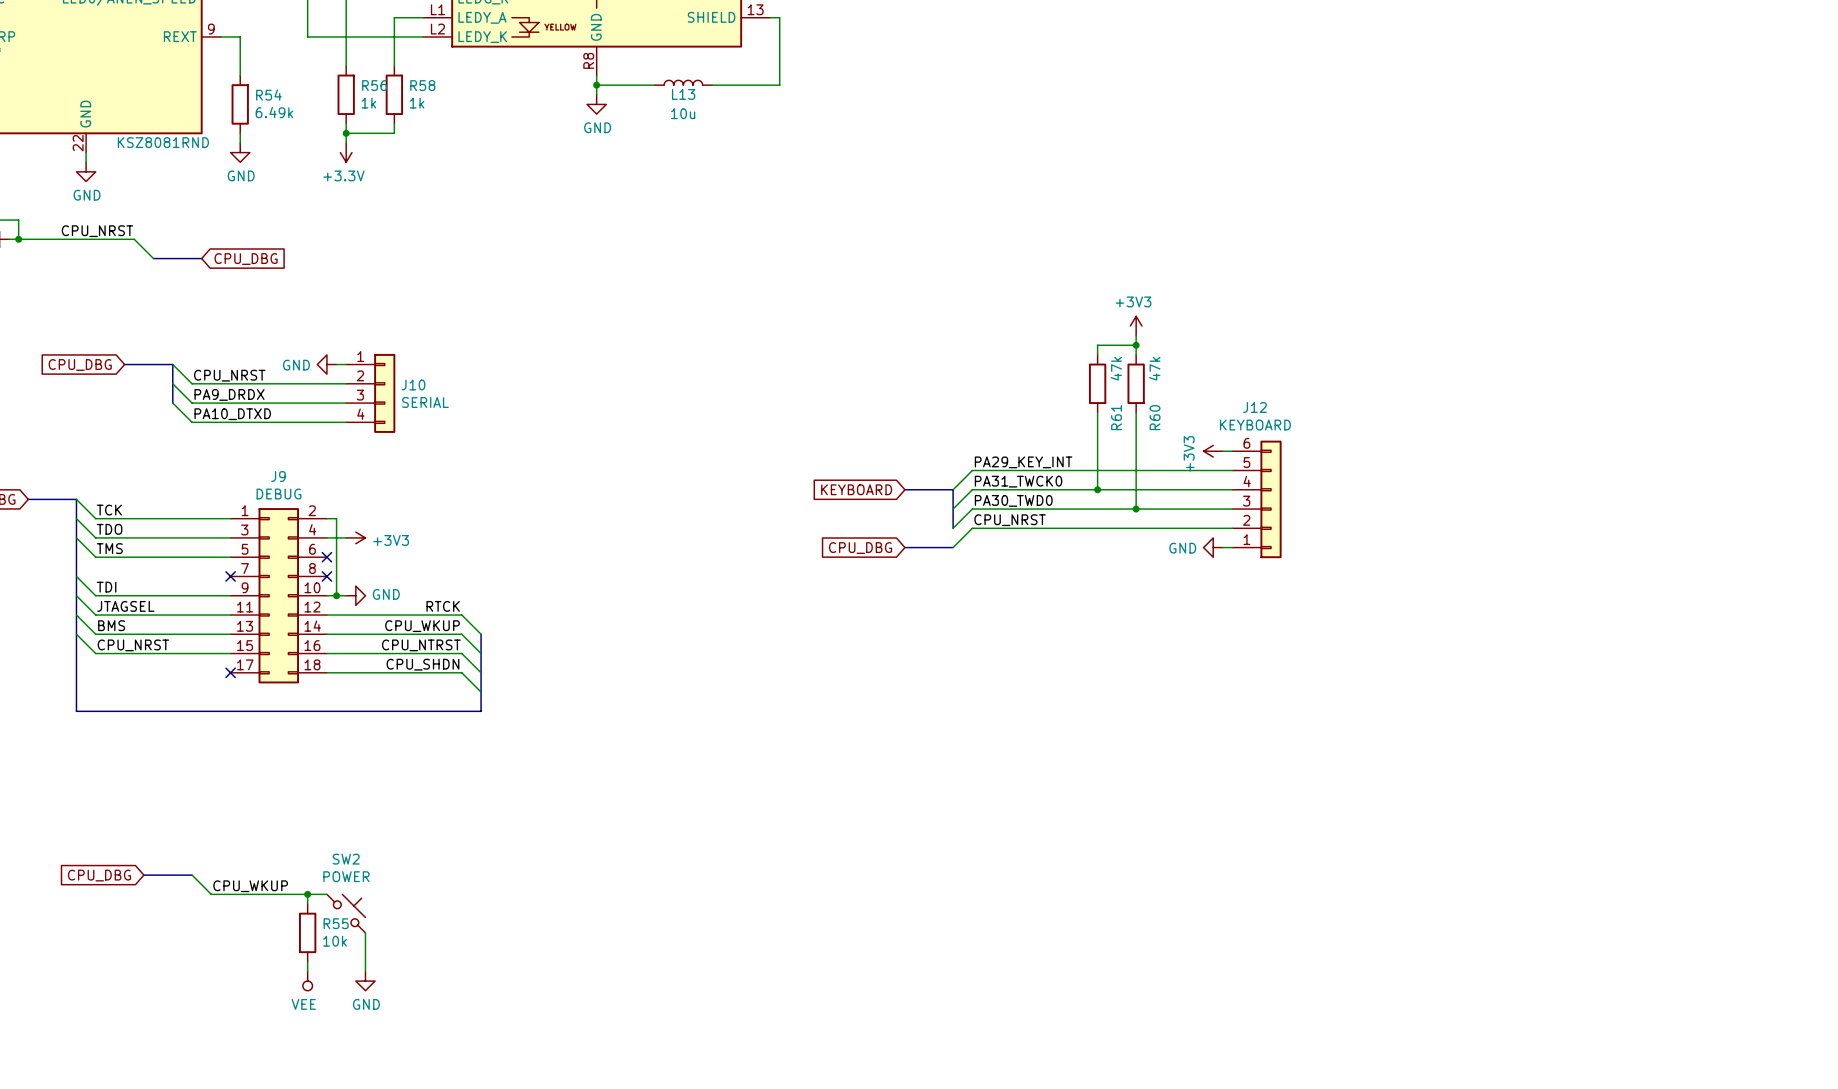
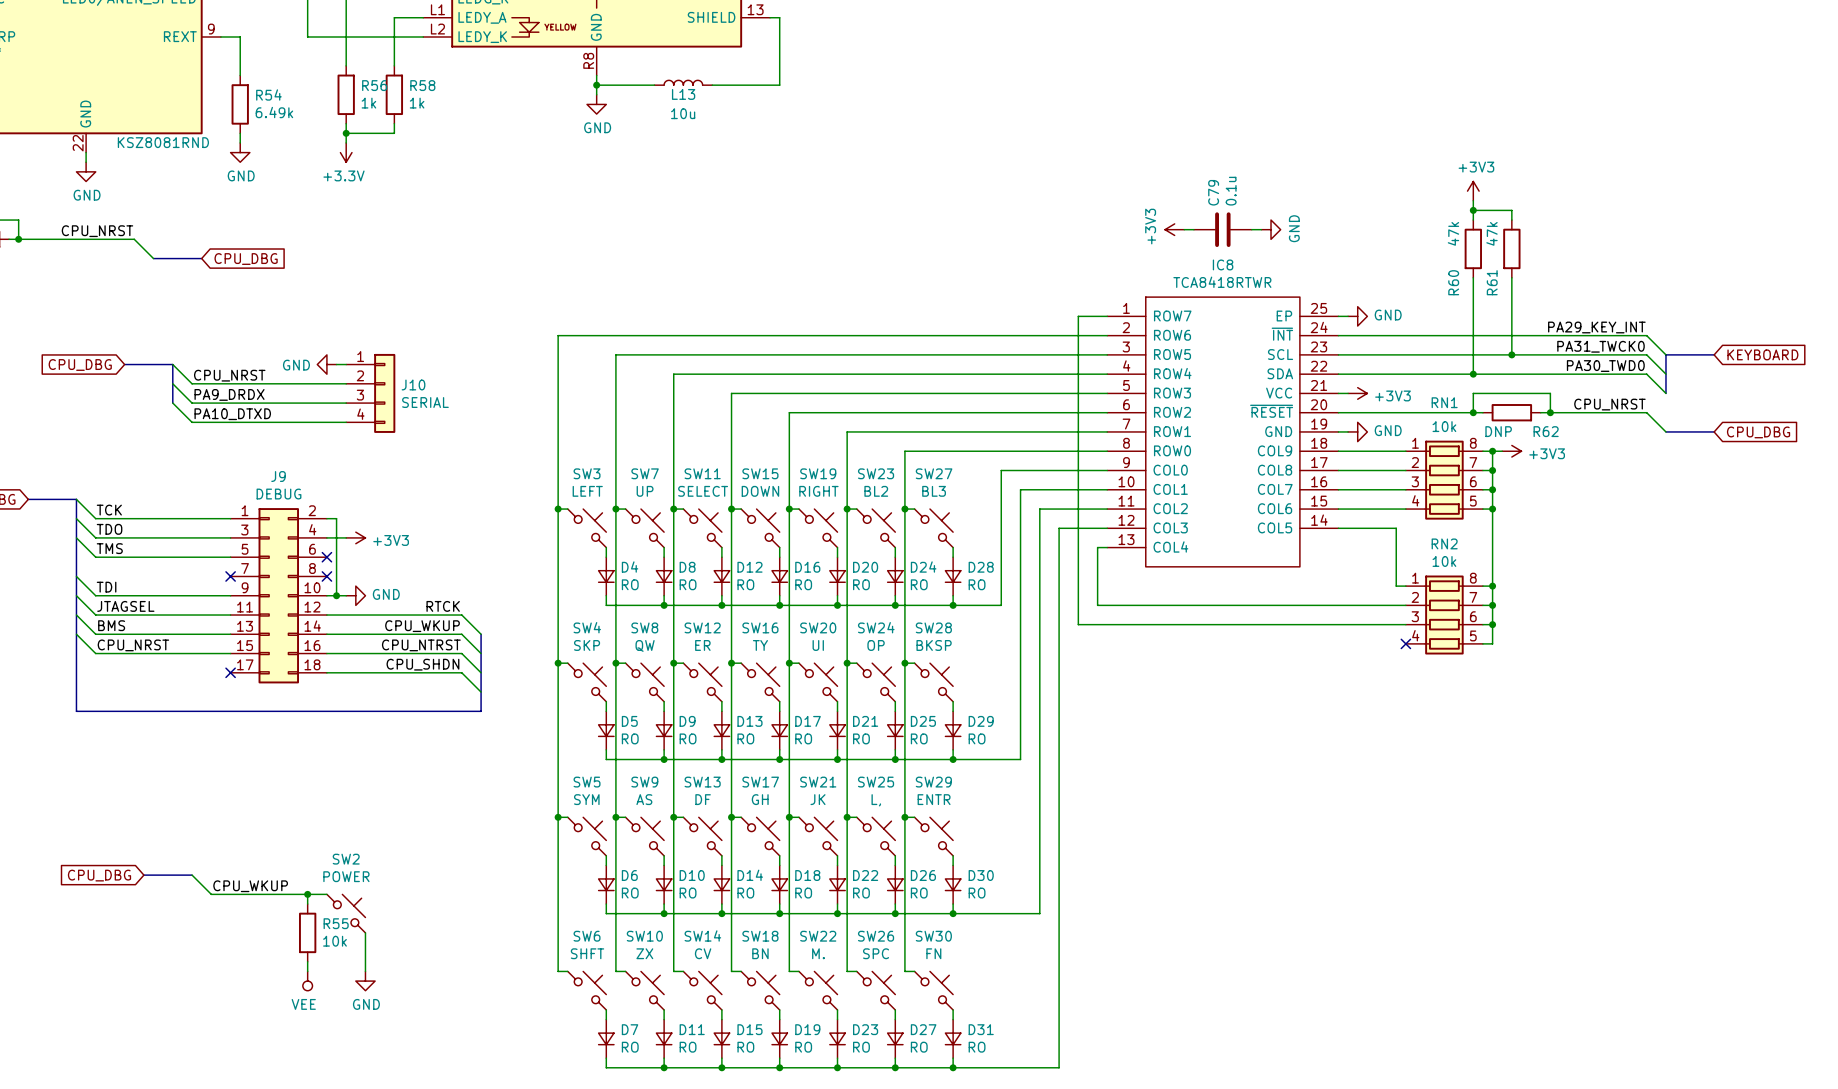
power symbol: none -> +3V3 (1473, 191)
wire: none -> (1473, 200) (1473, 220)
wire: none -> (1473, 210) (1511, 210) (1511, 220)
junction: none -> (1473, 210)
wire: none -> (1184, 229) (1193, 229)
C79: none -> 0.1u (1222, 229)
wire: none -> (1251, 229) (1261, 229)
power symbol: none -> GND (1271, 229)
wire: none -> (1473, 277) (1473, 374)
wire: none -> (1511, 277) (1511, 354)
wire: none -> (1107, 316) (1078, 316) (1078, 624) (1405, 624)
wire: none -> (1338, 316) (1348, 316)
power symbol: none -> GND (1357, 316)
power symbol rotation: 0° (1136, 326) -> 90° counterclockwise (1174, 229)
power symbol position: +3V3 (1136, 326) -> +3V3 (1174, 229)
label: none -> PA29_KEY_INT (1596, 327)
wire: none -> (1107, 335) (558, 335) (558, 971) (567, 971)
wire: (1136, 335) (1136, 354) -> none
wire: none -> (1338, 335) (1646, 335) (1665, 354)
wire: (1136, 345) (1097, 345) (1097, 354) -> none
junction: (1136, 345) -> none
label: none -> PA31_TWCK0 (1601, 346)
wire: none -> (1107, 354) (615, 354) (615, 971) (625, 971)
wire: none -> (1338, 354) (1646, 354) (1665, 374)
junction: none -> (1511, 354)
bus: none -> (1714, 354) (1665, 354) (1665, 393)
global label: none -> KEYBOARD (1762, 354)
label: none -> PA30_TWD0 (1605, 366)
R61 value position: 47k (1116, 368) -> 47k (1491, 233)
R60 value position: 47k (1154, 368) -> 47k (1453, 233)
wire: none -> (1107, 374) (673, 374) (673, 971) (683, 971)
wire: none -> (1338, 374) (1646, 374) (1665, 393)
junction: none -> (1473, 374)
R61 position: (1097, 383) -> (1511, 248)
R60 position: (1136, 383) -> (1473, 248)
wire: none -> (1107, 393) (731, 393) (731, 971) (741, 971)
wire: none -> (1338, 393) (1348, 393)
power symbol: none -> +3V3 (1357, 393)
label: none -> CPU_NRST (1609, 404)
wire: (1097, 412) (1097, 489) -> none
wire: none -> (1107, 412) (789, 412) (789, 971) (798, 971)
wire: (1136, 412) (1136, 509) -> none
wire: none -> (1338, 412) (1482, 412)
wire: none -> (1473, 412) (1473, 393) (1550, 393) (1550, 412)
junction: none -> (1473, 412)
R62: none -> DNP (1511, 412)
wire: none -> (1540, 412) (1646, 412) (1665, 431)
junction: none -> (1550, 412)
R61 name position: R61 (1116, 417) -> R61 (1492, 282)
R60 name position: R60 (1155, 417) -> R60 (1453, 282)
wire: none -> (1107, 431) (847, 431) (847, 971) (856, 971)
IC8: none -> TCA8418RTWR (1222, 431)
power symbol: none -> GND (1357, 431)
bus: none -> (1665, 431) (1714, 431)
global label: none -> CPU_DBG (1758, 432)
wire: none -> (1107, 451) (904, 451) (904, 971) (914, 971)
power symbol: +3V3 (1213, 451) -> none
wire: (1222, 451) (1232, 451) -> (1338, 431) (1348, 431)
wire: none -> (1338, 451) (1405, 451)
wire: none -> (1482, 451) (1502, 451)
wire: none -> (1492, 451) (1492, 643) (1482, 643)
junction: none -> (1492, 451)
power symbol: none -> +3V3 (1511, 451)
label: PA29_KEY_INT (1023, 462) -> none
wire: (1001, 470) (972, 470) (953, 489) -> (1001, 470) (1001, 605) (606, 605) (606, 595)
wire: (1107, 470) (1232, 470) -> none
wire: none -> (1338, 470) (1405, 470)
wire: none -> (1482, 470) (1492, 470)
junction: none -> (1492, 470)
RN1: none -> 10k (1444, 480)
label: PA31_TWCK0 (1018, 481) -> none
global label: KEYBOARD (856, 489) -> none
bus: (904, 489) (953, 489) (953, 528) -> none
wire: (1020, 489) (972, 489) (953, 509) -> (1020, 489) (1020, 759) (606, 759) (606, 749)
junction: (1097, 489) -> none
wire: (1107, 489) (1232, 489) -> none
wire: none -> (1338, 489) (1405, 489)
wire: none -> (1482, 489) (1492, 489)
junction: none -> (1492, 489)
J12: KEYBOARD (1257, 499) -> none
label: PA30_TWD0 (1013, 500) -> none
wire: none -> (558, 509) (567, 509)
junction: none -> (558, 509)
wire: none -> (615, 509) (625, 509)
junction: none -> (615, 509)
wire: none -> (673, 509) (683, 509)
junction: none -> (673, 509)
wire: none -> (731, 509) (741, 509)
junction: none -> (731, 509)
wire: none -> (789, 509) (798, 509)
junction: none -> (789, 509)
wire: none -> (847, 509) (856, 509)
junction: none -> (847, 509)
wire: none -> (904, 509) (914, 509)
junction: none -> (904, 509)
wire: (1039, 509) (972, 509) (953, 528) -> (1039, 509) (1039, 913) (606, 913) (606, 904)
wire: (1107, 509) (1232, 509) -> none
junction: (1136, 509) -> none
wire: none -> (1338, 509) (1405, 509)
wire: none -> (1482, 509) (1492, 509)
junction: none -> (1492, 509)
label: CPU_NRST (1010, 520) -> none
SW3: none -> LEFT (587, 528)
SW7: none -> UP (644, 528)
SW11: none -> SELECT (702, 528)
SW15: none -> DOWN (760, 528)
SW19: none -> RIGHT (818, 528)
SW23: none -> BL2 (876, 528)
SW27: none -> BL3 (933, 528)
wire: (1059, 528) (972, 528) (953, 547) -> (953, 557) (953, 547)
wire: none -> (1059, 528) (1059, 1067) (606, 1067) (606, 1058)
wire: (1107, 528) (1232, 528) -> none
wire: none -> (1338, 528) (1396, 528) (1396, 586) (1405, 586)
wire: none -> (606, 547) (606, 557)
wire: none -> (664, 547) (664, 557)
wire: none -> (721, 547) (721, 557)
wire: none -> (779, 547) (779, 557)
wire: none -> (837, 547) (837, 557)
wire: none -> (895, 547) (895, 557)
bus: (904, 547) (953, 547) -> none
wire: none -> (1107, 547) (1097, 547) (1097, 605) (1405, 605)
power symbol: GND (1213, 547) -> none
wire: (1222, 547) (1232, 547) -> none
global label: CPU_DBG (860, 548) -> none
D4: none -> RO (606, 576)
D8: none -> RO (664, 576)
D12: none -> RO (721, 576)
D16: none -> RO (779, 576)
D20: none -> RO (837, 576)
D24: none -> RO (895, 576)
D28: none -> RO (953, 576)
wire: none -> (1482, 586) (1492, 586)
junction: none -> (1492, 586)
wire: none -> (664, 595) (664, 605)
wire: none -> (721, 595) (721, 605)
wire: none -> (779, 595) (779, 605)
wire: none -> (837, 595) (837, 605)
wire: none -> (895, 595) (895, 605)
wire: none -> (953, 595) (953, 605)
junction: none -> (664, 605)
junction: none -> (721, 605)
junction: none -> (779, 605)
junction: none -> (837, 605)
junction: none -> (895, 605)
junction: none -> (953, 605)
wire: none -> (1482, 605) (1492, 605)
junction: none -> (1492, 605)
RN2: none -> 10k (1444, 615)
wire: none -> (1482, 624) (1492, 624)
junction: none -> (1492, 624)
no-connect mark: none -> (1405, 643)
wire: none -> (558, 663) (567, 663)
junction: none -> (558, 663)
wire: none -> (615, 663) (625, 663)
junction: none -> (615, 663)
wire: none -> (673, 663) (683, 663)
junction: none -> (673, 663)
wire: none -> (731, 663) (741, 663)
junction: none -> (731, 663)
wire: none -> (789, 663) (798, 663)
junction: none -> (789, 663)
wire: none -> (847, 663) (856, 663)
junction: none -> (847, 663)
wire: none -> (904, 663) (914, 663)
junction: none -> (904, 663)
SW4: none -> SKP (587, 682)
SW8: none -> QW (644, 682)
SW12: none -> ER (702, 682)
SW16: none -> TY (760, 682)
SW20: none -> UI (818, 682)
SW24: none -> OP (876, 682)
SW28: none -> BKSP (933, 682)
wire: none -> (606, 701) (606, 711)
wire: none -> (664, 701) (664, 711)
wire: none -> (721, 701) (721, 711)
wire: none -> (779, 701) (779, 711)
wire: none -> (837, 701) (837, 711)
wire: none -> (895, 701) (895, 711)
wire: none -> (953, 701) (953, 711)
D5: none -> RO (606, 730)
D9: none -> RO (664, 730)
D13: none -> RO (721, 730)
D17: none -> RO (779, 730)
D21: none -> RO (837, 730)
D25: none -> RO (895, 730)
D29: none -> RO (953, 730)
wire: none -> (664, 749) (664, 759)
wire: none -> (721, 749) (721, 759)
wire: none -> (779, 749) (779, 759)
wire: none -> (837, 749) (837, 759)
wire: none -> (895, 749) (895, 759)
wire: none -> (953, 749) (953, 759)
junction: none -> (664, 759)
junction: none -> (721, 759)
junction: none -> (779, 759)
junction: none -> (837, 759)
junction: none -> (895, 759)
junction: none -> (953, 759)
wire: none -> (558, 817) (567, 817)
junction: none -> (558, 817)
wire: none -> (615, 817) (625, 817)
junction: none -> (615, 817)
wire: none -> (673, 817) (683, 817)
junction: none -> (673, 817)
wire: none -> (731, 817) (741, 817)
junction: none -> (731, 817)
wire: none -> (789, 817) (798, 817)
junction: none -> (789, 817)
wire: none -> (847, 817) (856, 817)
junction: none -> (847, 817)
wire: none -> (904, 817) (914, 817)
junction: none -> (904, 817)
SW5: none -> SYM (587, 836)
SW9: none -> AS (644, 836)
SW13: none -> DF (702, 836)
SW17: none -> GH (760, 836)
SW21: none -> JK (818, 836)
SW25: none -> L, (876, 836)
SW29: none -> ENTR (933, 836)
wire: none -> (606, 855) (606, 865)
wire: none -> (664, 855) (664, 865)
wire: none -> (721, 855) (721, 865)
wire: none -> (779, 855) (779, 865)
wire: none -> (837, 855) (837, 865)
wire: none -> (895, 855) (895, 865)
wire: none -> (953, 855) (953, 865)
D6: none -> RO (606, 884)
D10: none -> RO (664, 884)
D14: none -> RO (721, 884)
D18: none -> RO (779, 884)
D22: none -> RO (837, 884)
D26: none -> RO (895, 884)
D30: none -> RO (953, 884)
wire: none -> (664, 904) (664, 913)
wire: none -> (721, 904) (721, 913)
wire: none -> (779, 904) (779, 913)
wire: none -> (837, 904) (837, 913)
wire: none -> (895, 904) (895, 913)
wire: none -> (953, 904) (953, 913)
junction: none -> (664, 913)
junction: none -> (721, 913)
junction: none -> (779, 913)
junction: none -> (837, 913)
junction: none -> (895, 913)
junction: none -> (953, 913)
SW6: none -> SHFT (587, 990)
SW10: none -> ZX (644, 990)
SW14: none -> CV (702, 990)
SW18: none -> BN (760, 990)
SW22: none -> M. (818, 990)
SW26: none -> SPC (876, 990)
SW30: none -> FN (933, 990)
wire: none -> (606, 1009) (606, 1019)
wire: none -> (664, 1009) (664, 1019)
wire: none -> (721, 1009) (721, 1019)
wire: none -> (779, 1009) (779, 1019)
wire: none -> (837, 1009) (837, 1019)
wire: none -> (895, 1009) (895, 1019)
wire: none -> (953, 1009) (953, 1019)
D7: none -> RO (606, 1038)
D11: none -> RO (664, 1038)
D15: none -> RO (721, 1038)
D19: none -> RO (779, 1038)
D23: none -> RO (837, 1038)
D27: none -> RO (895, 1038)
D31: none -> RO (953, 1038)
wire: none -> (664, 1058) (664, 1067)
wire: none -> (721, 1058) (721, 1067)
wire: none -> (779, 1058) (779, 1067)
wire: none -> (837, 1058) (837, 1067)
wire: none -> (895, 1058) (895, 1067)
wire: none -> (953, 1058) (953, 1067)
junction: none -> (664, 1067)
junction: none -> (721, 1067)
junction: none -> (779, 1067)
junction: none -> (837, 1067)
junction: none -> (895, 1067)
junction: none -> (953, 1067)

